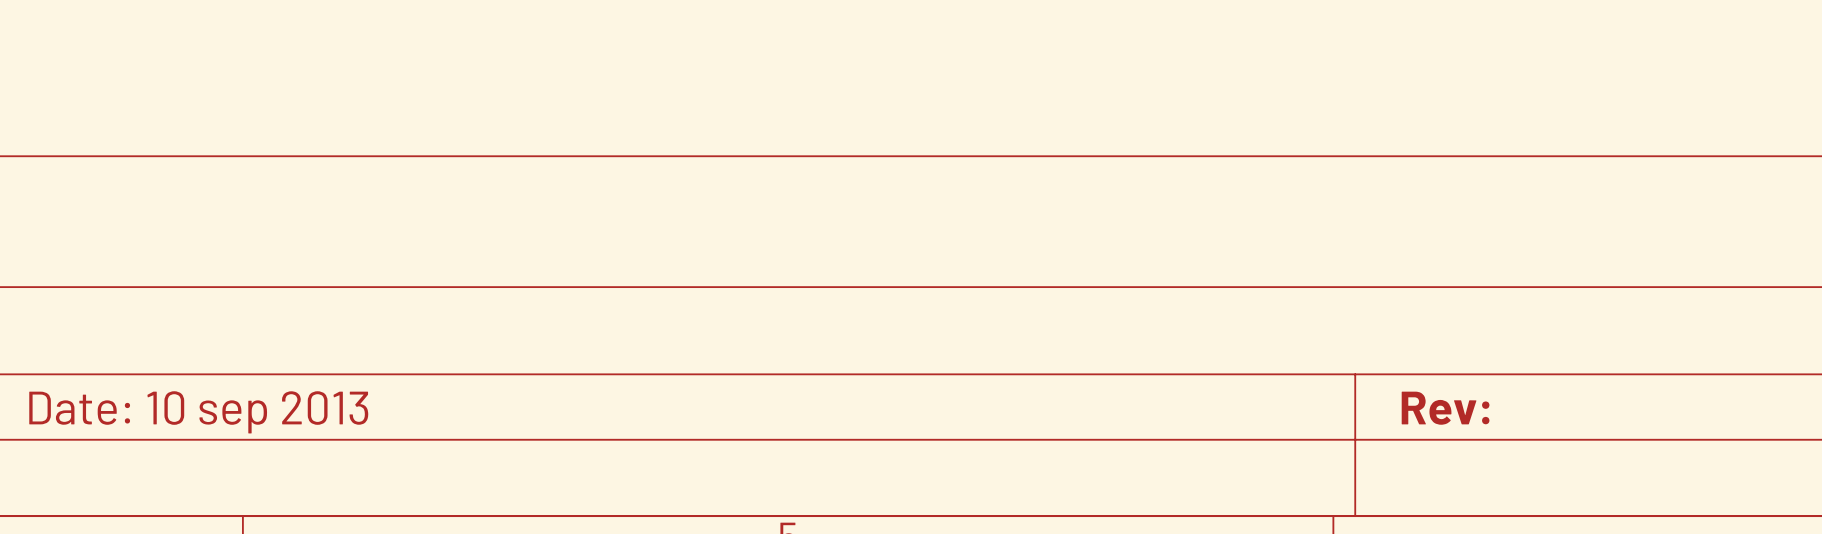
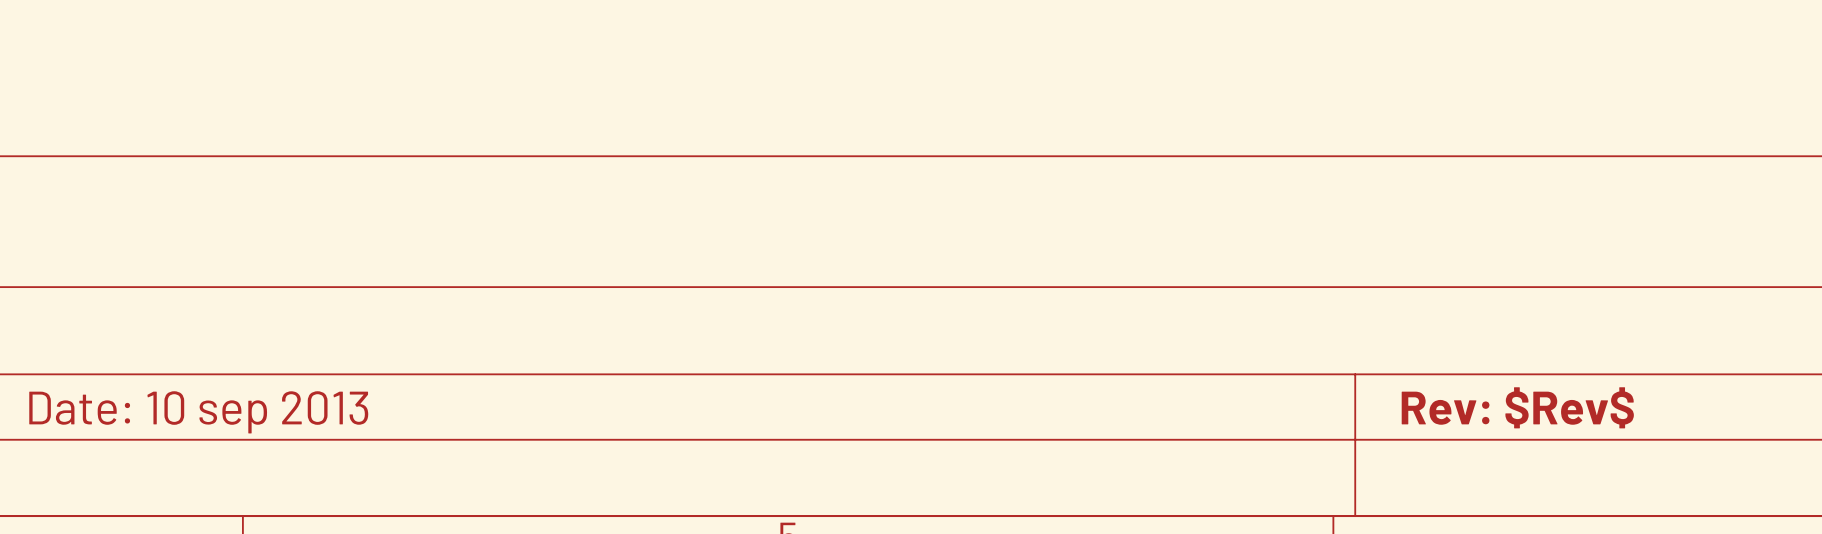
title block: Rev: (1445, 408) -> Rev: $Rev$ (1517, 407)

